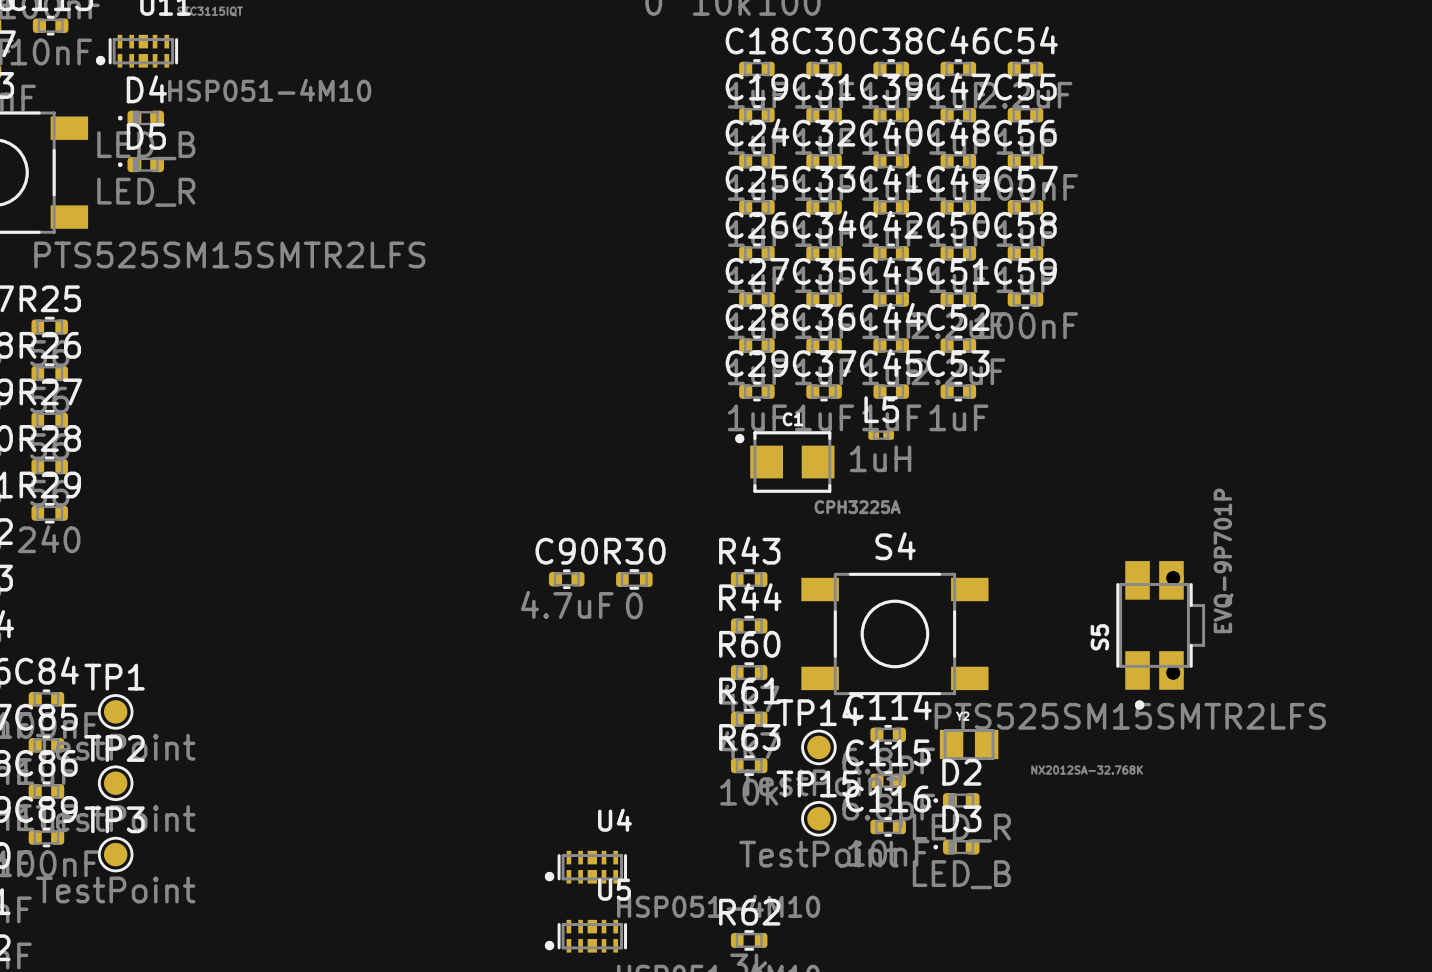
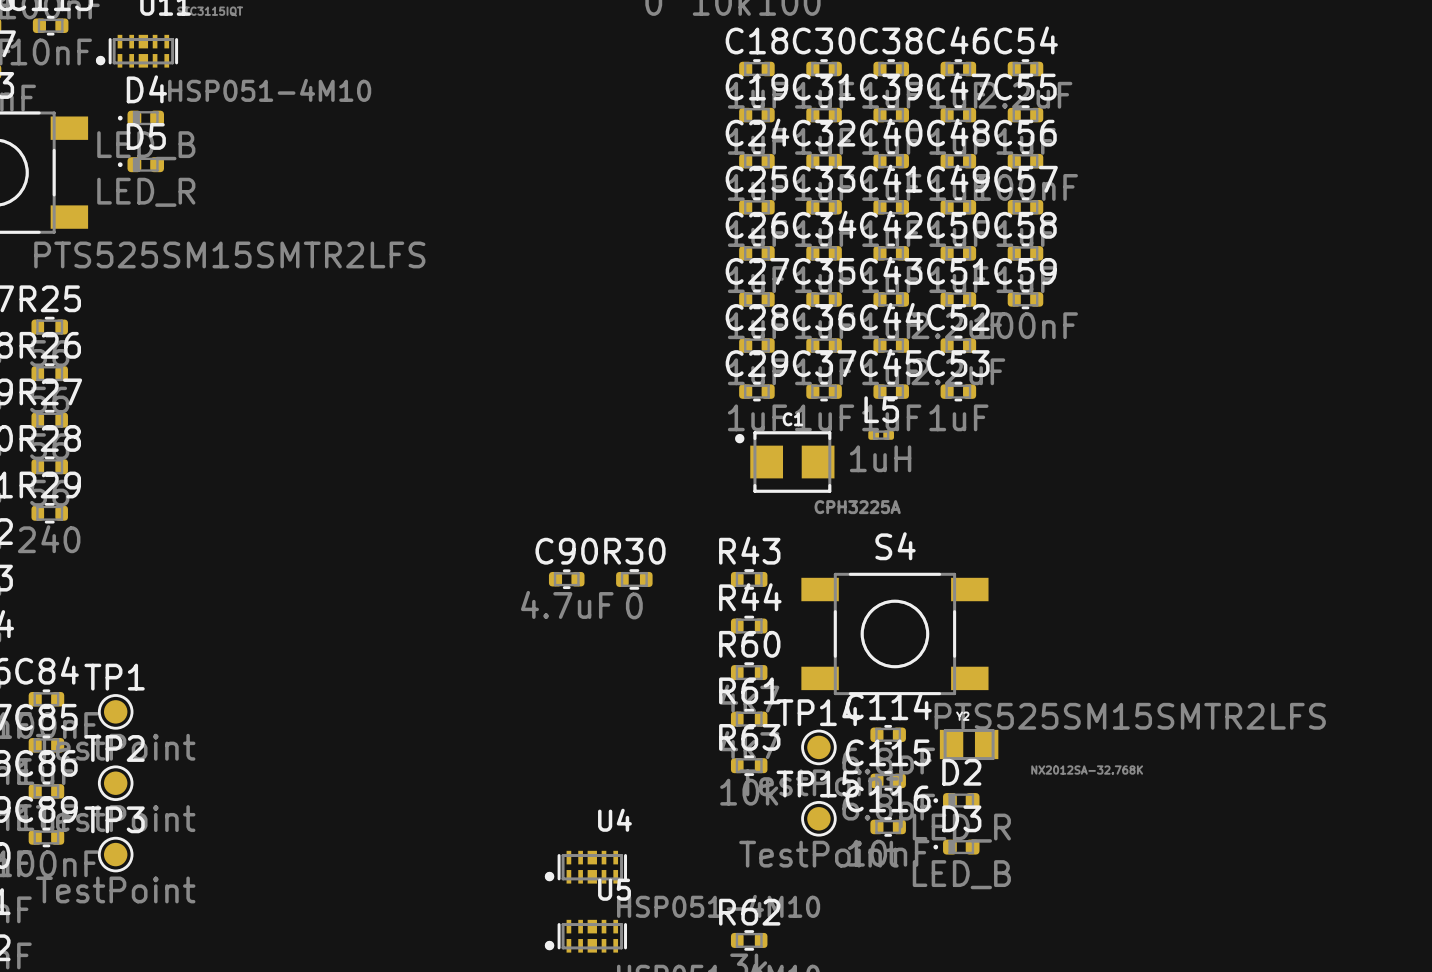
S5: EVQ-9P701P (1160, 635) -> none

